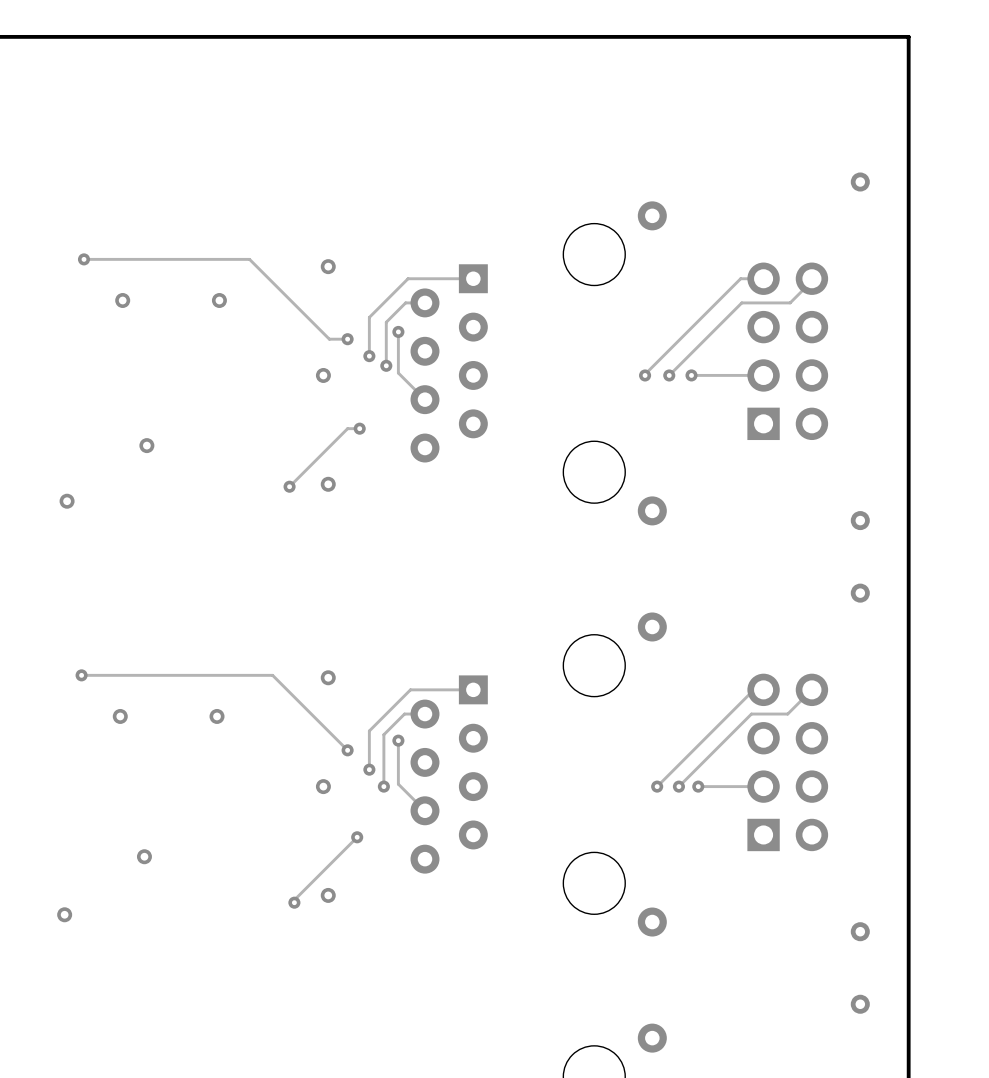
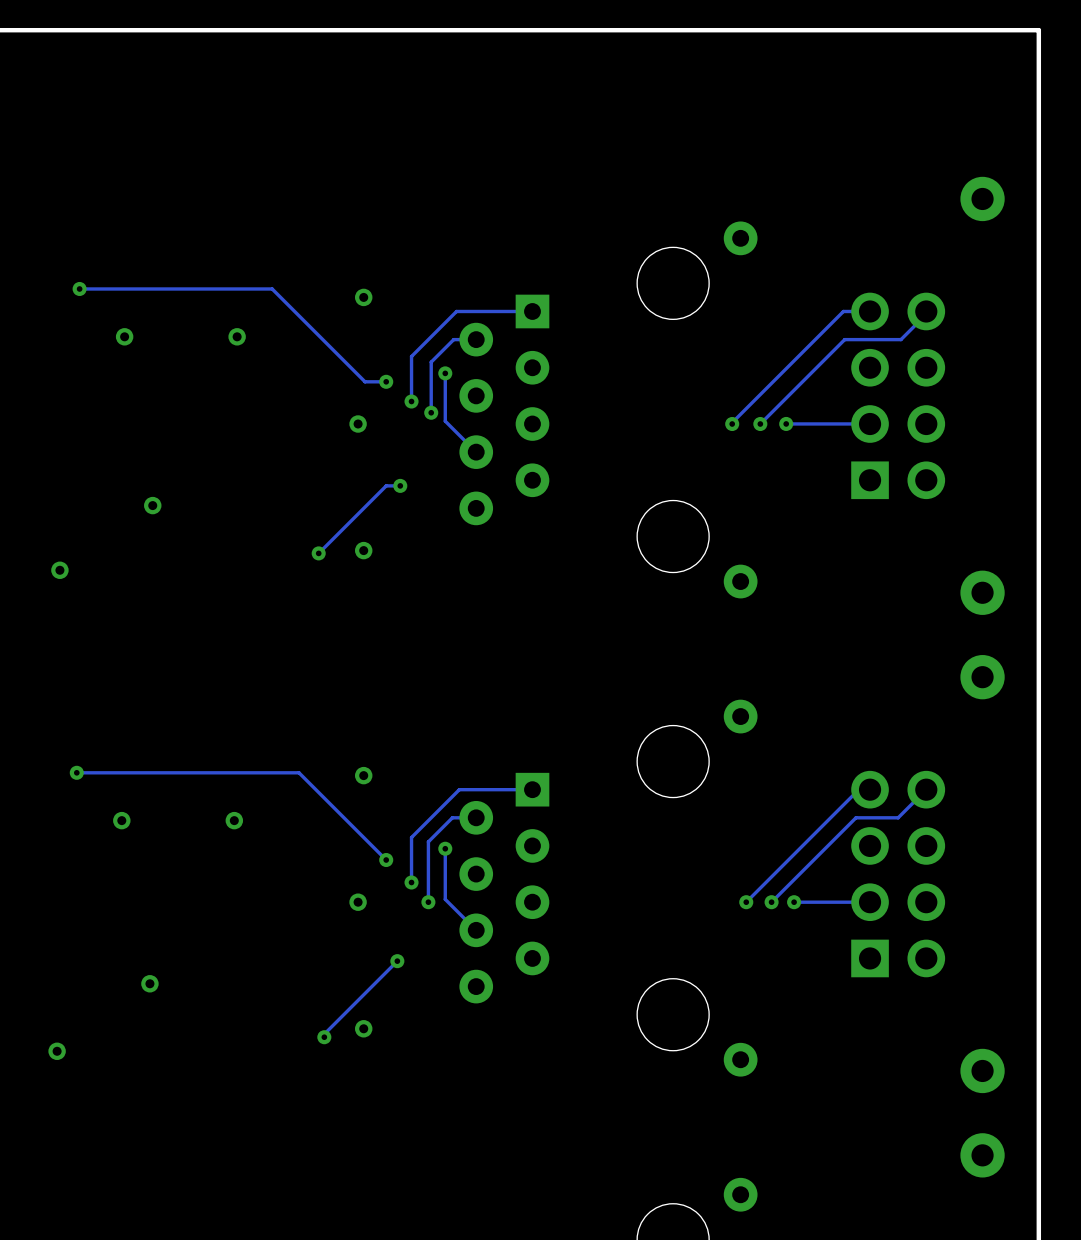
part footprint: [850, 172, 870, 192] -> [960, 176, 1005, 222]
part footprint: [850, 511, 870, 531] -> [960, 570, 1005, 615]
part footprint: [850, 583, 870, 603] -> [960, 655, 1005, 700]
part footprint: [850, 922, 870, 942] -> [960, 1048, 1005, 1094]
part footprint: [850, 994, 870, 1014] -> [960, 1133, 1005, 1178]

